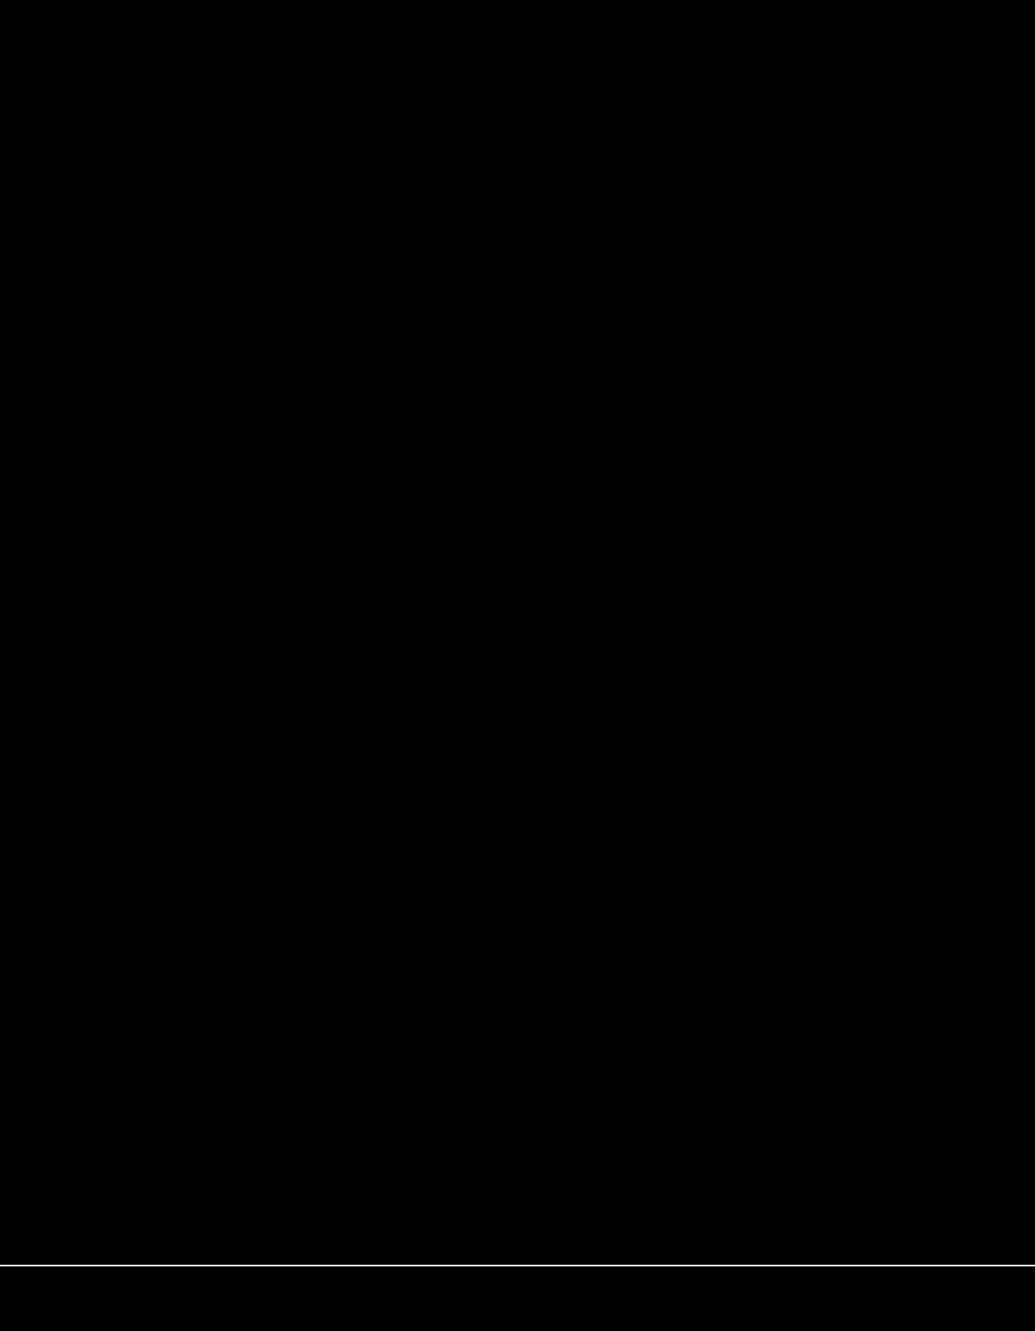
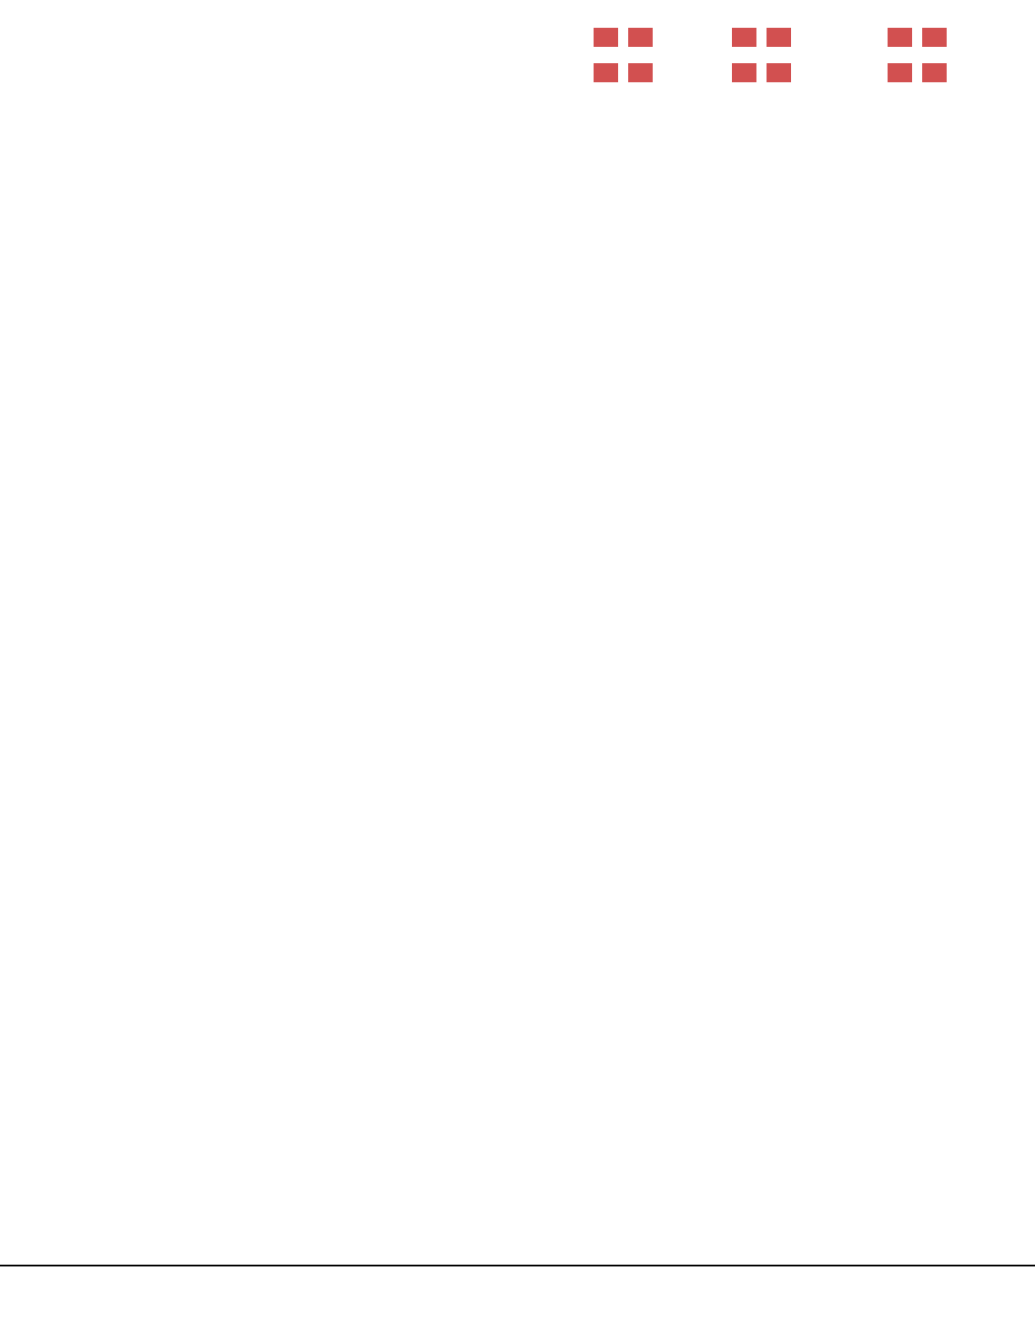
part: none -> (605, 55)
part: none -> (640, 55)
part: none -> (744, 55)
part: none -> (778, 55)
part: none -> (899, 55)
part: none -> (934, 55)

